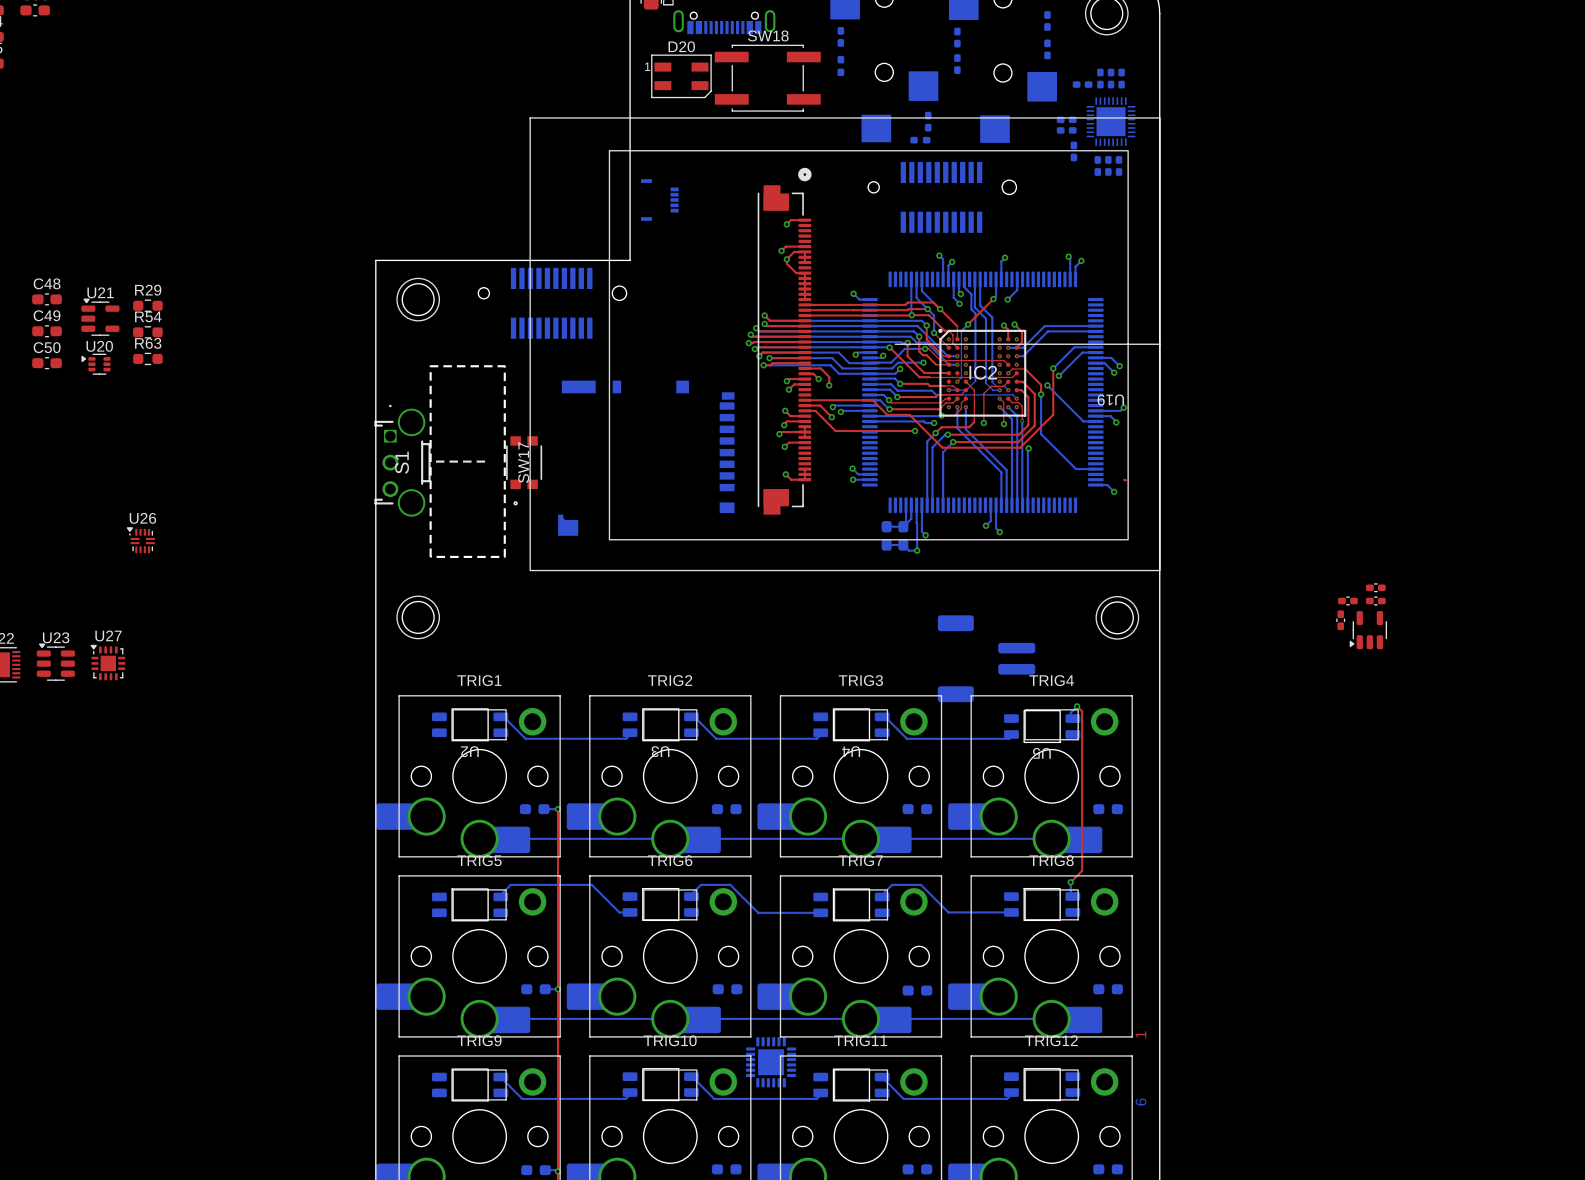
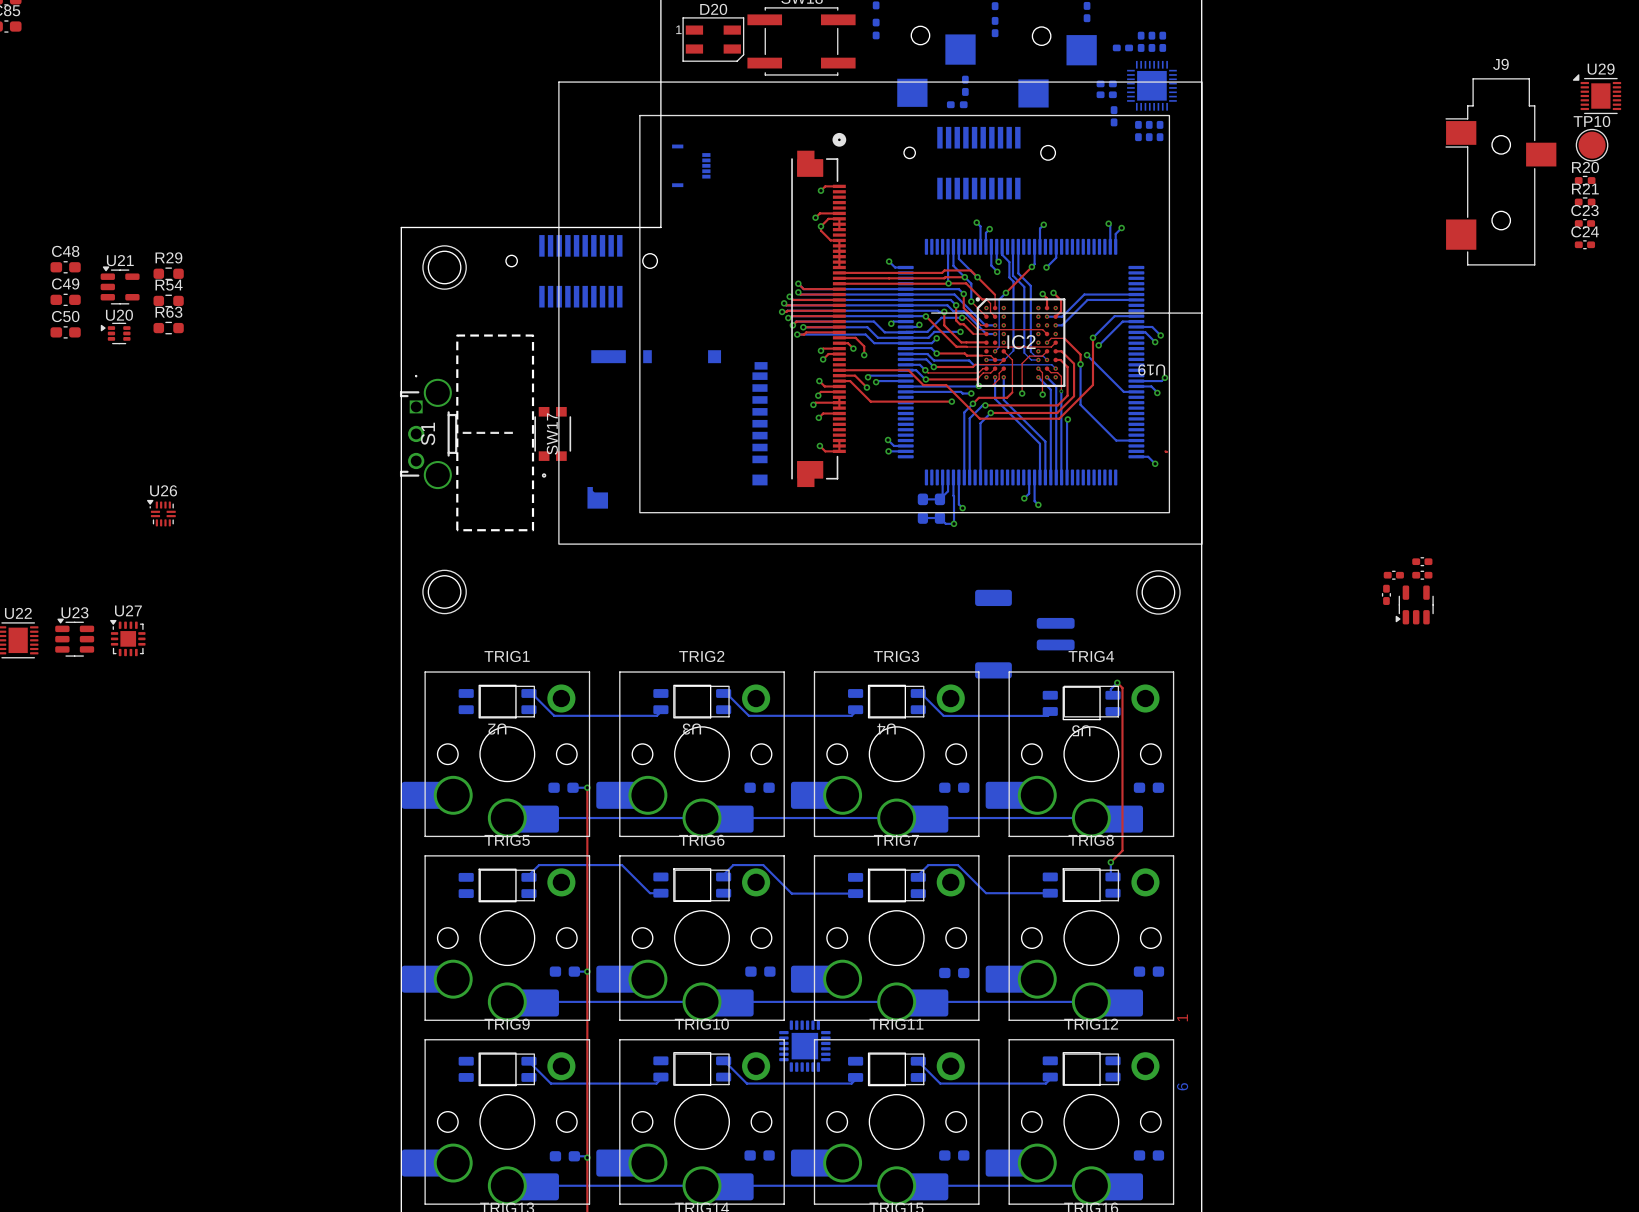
U29: none -> (1597, 94)
TP10: none -> (1592, 145)
J9: none -> (1500, 171)
R20: none -> (1585, 180)
R21: none -> (1585, 202)
C23: none -> (1584, 223)
C24: none -> (1584, 244)

